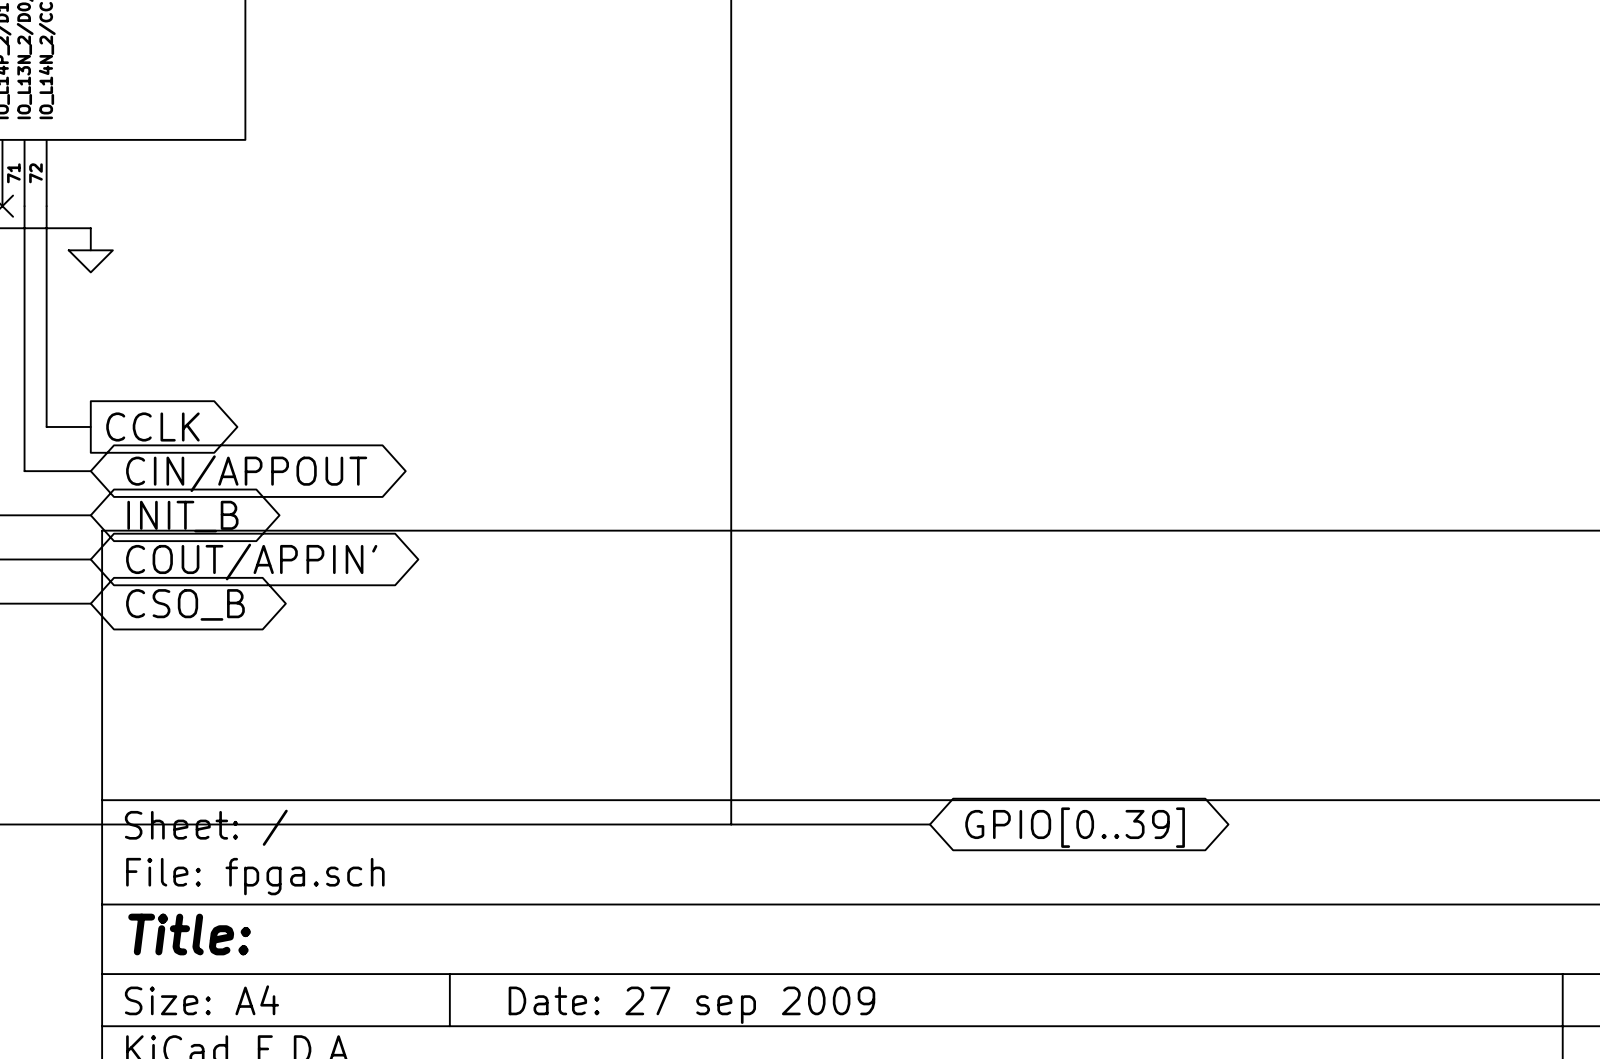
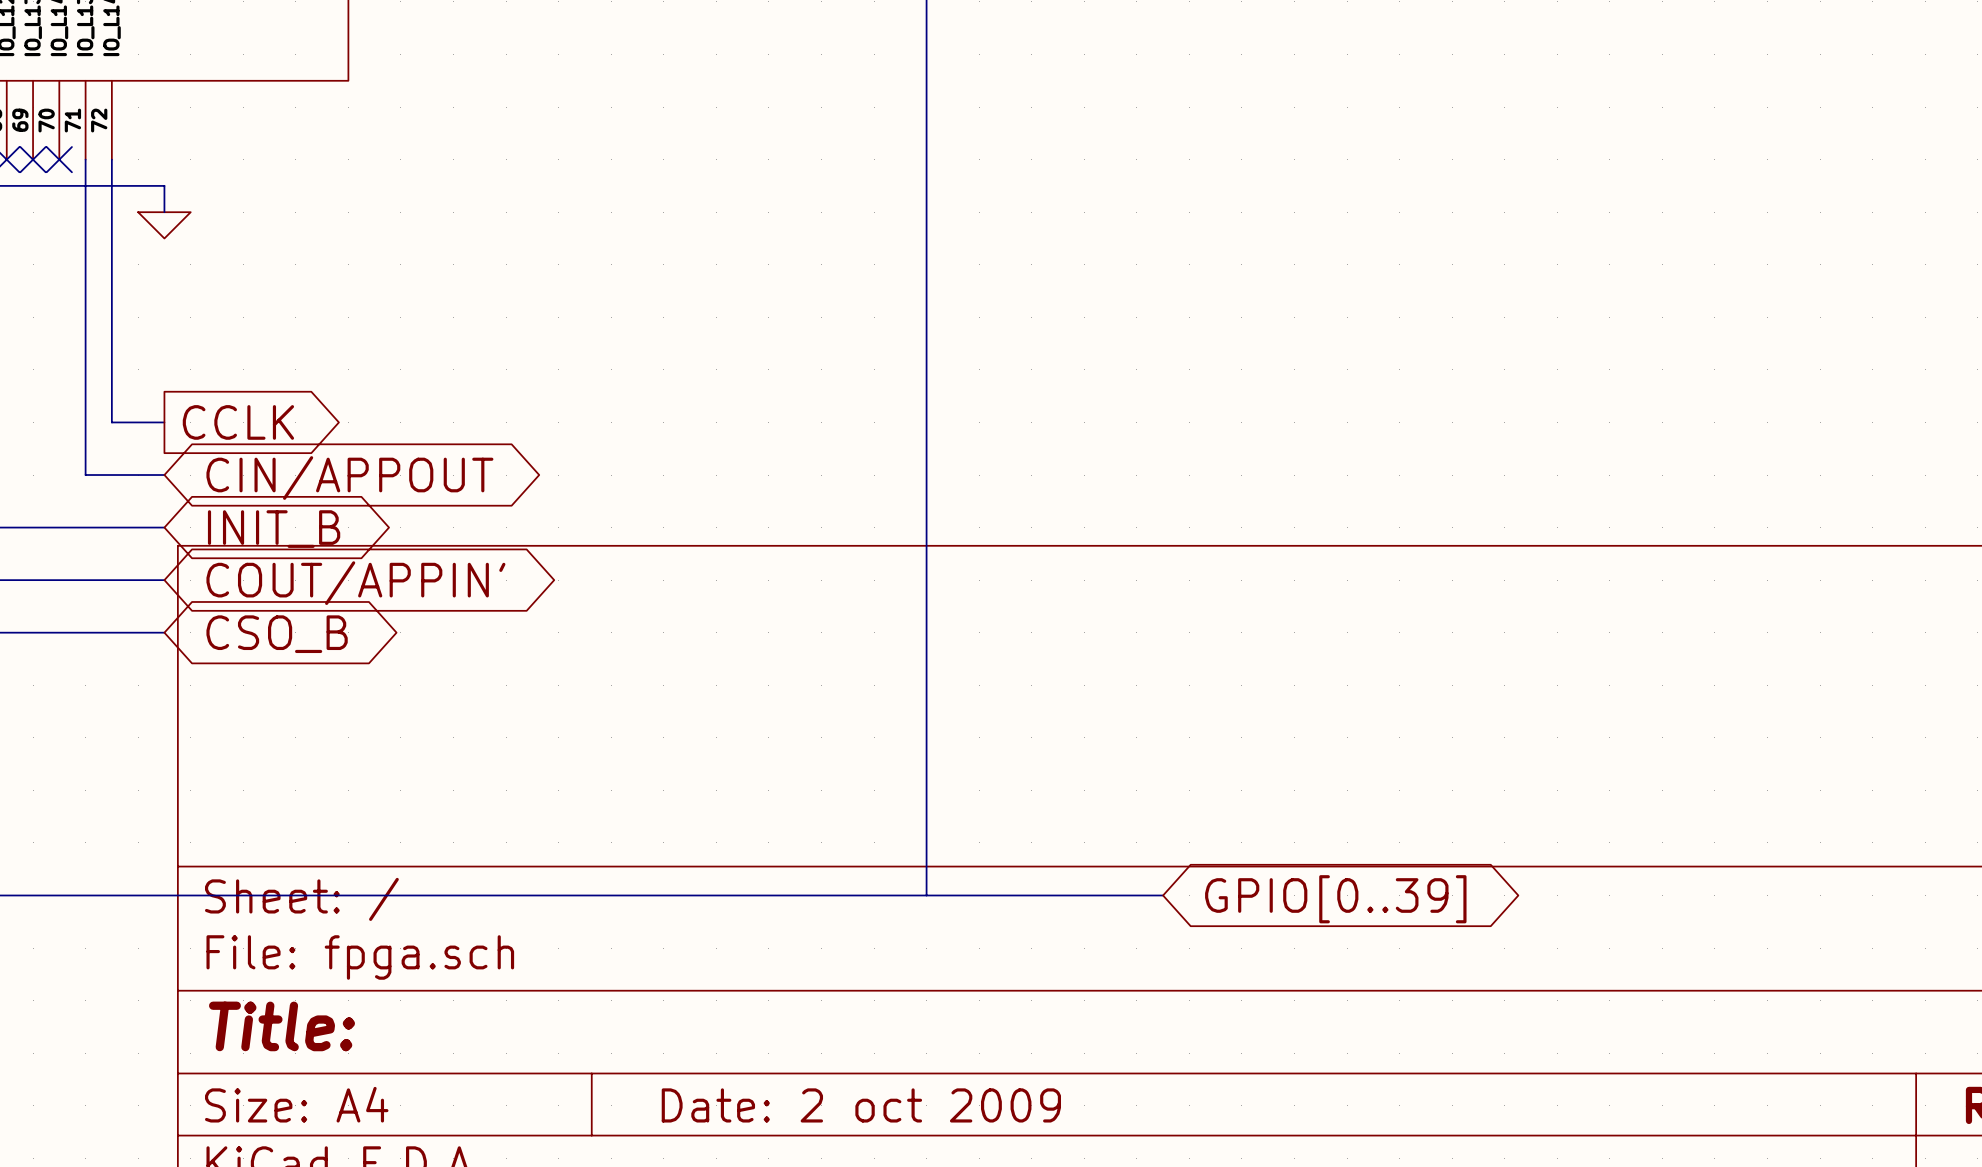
title block: Date: 27 sep 2009 (691, 1005) -> Date: 2 oct 2009 (861, 1105)

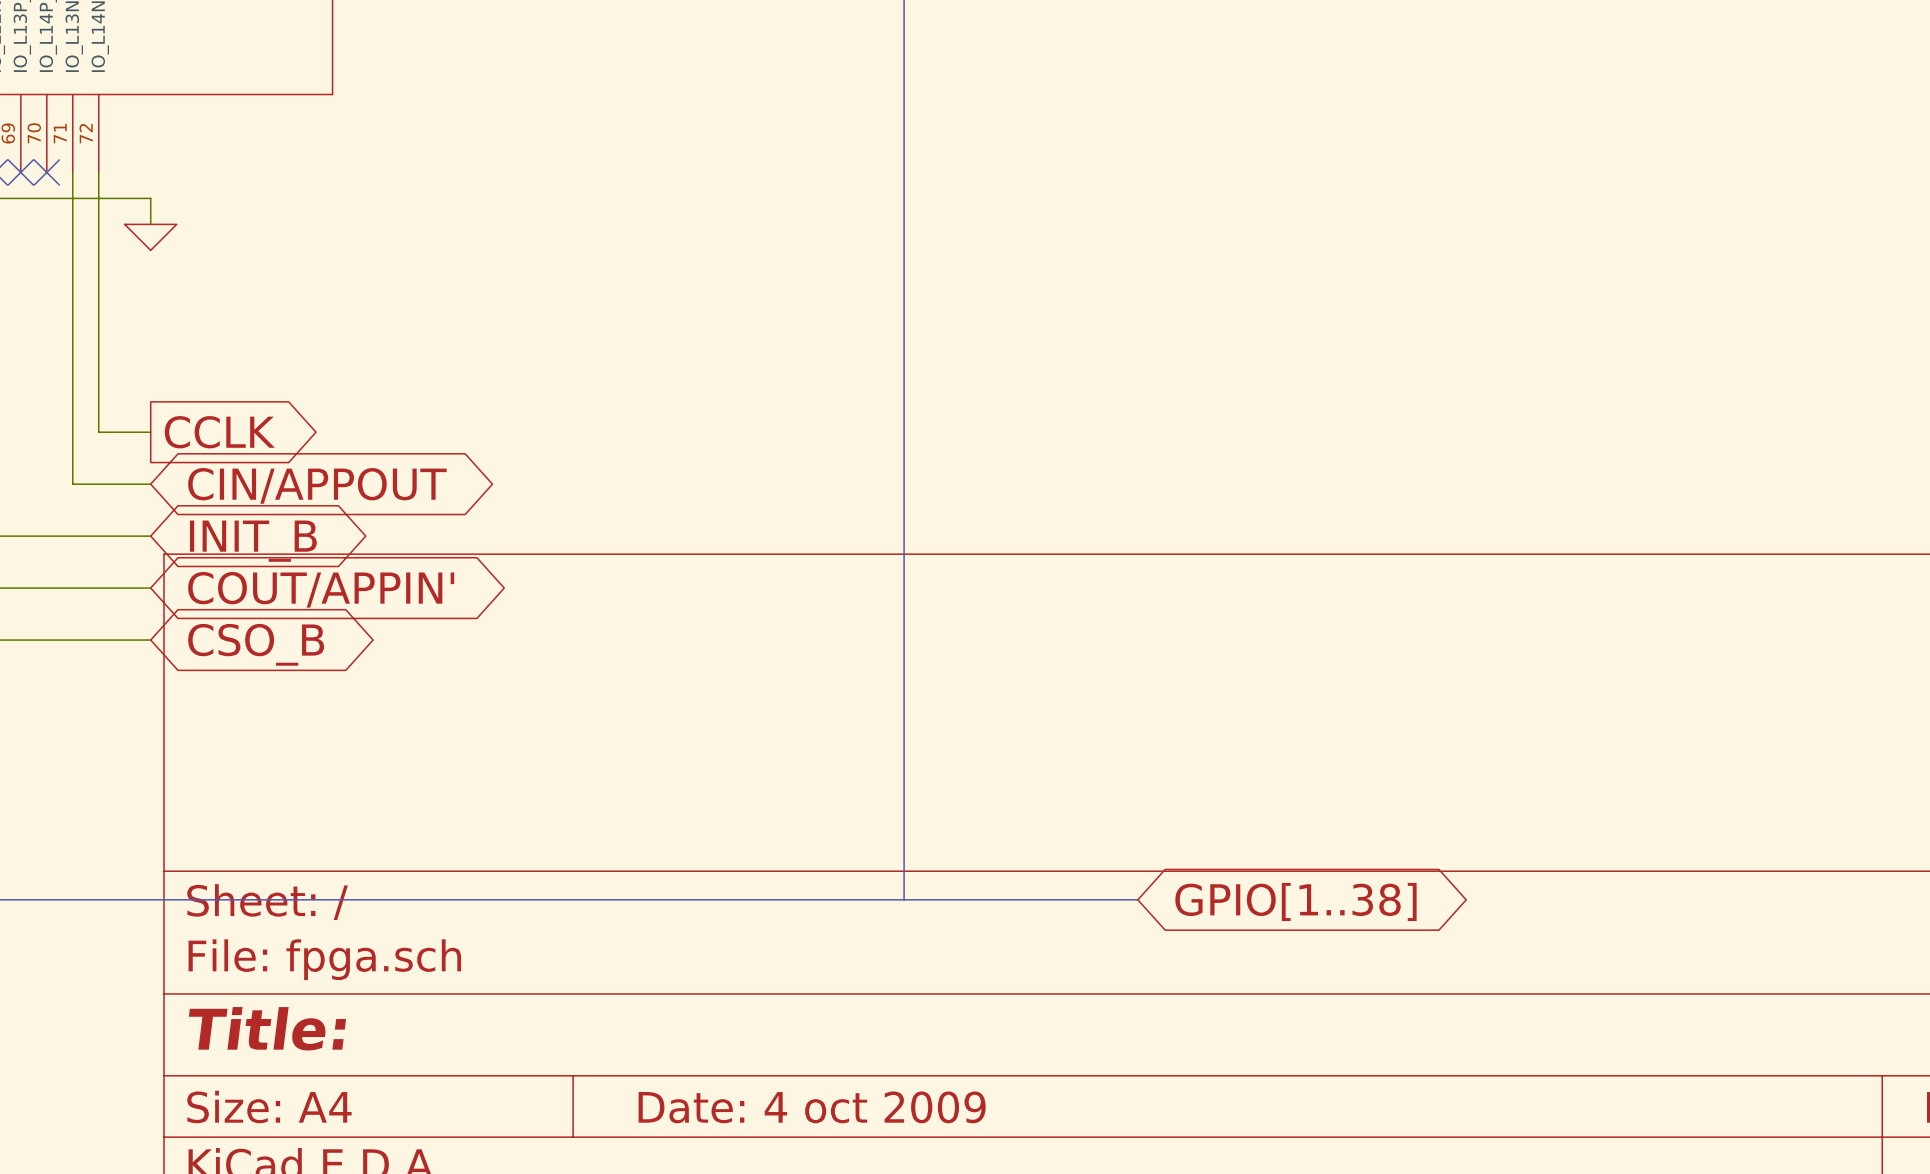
global label: GPIO[0..39] (1335, 899) -> GPIO[1..38] (1295, 901)
title block: Date: 2 oct 2009 (861, 1105) -> Date: 4 oct 2009 (812, 1107)

